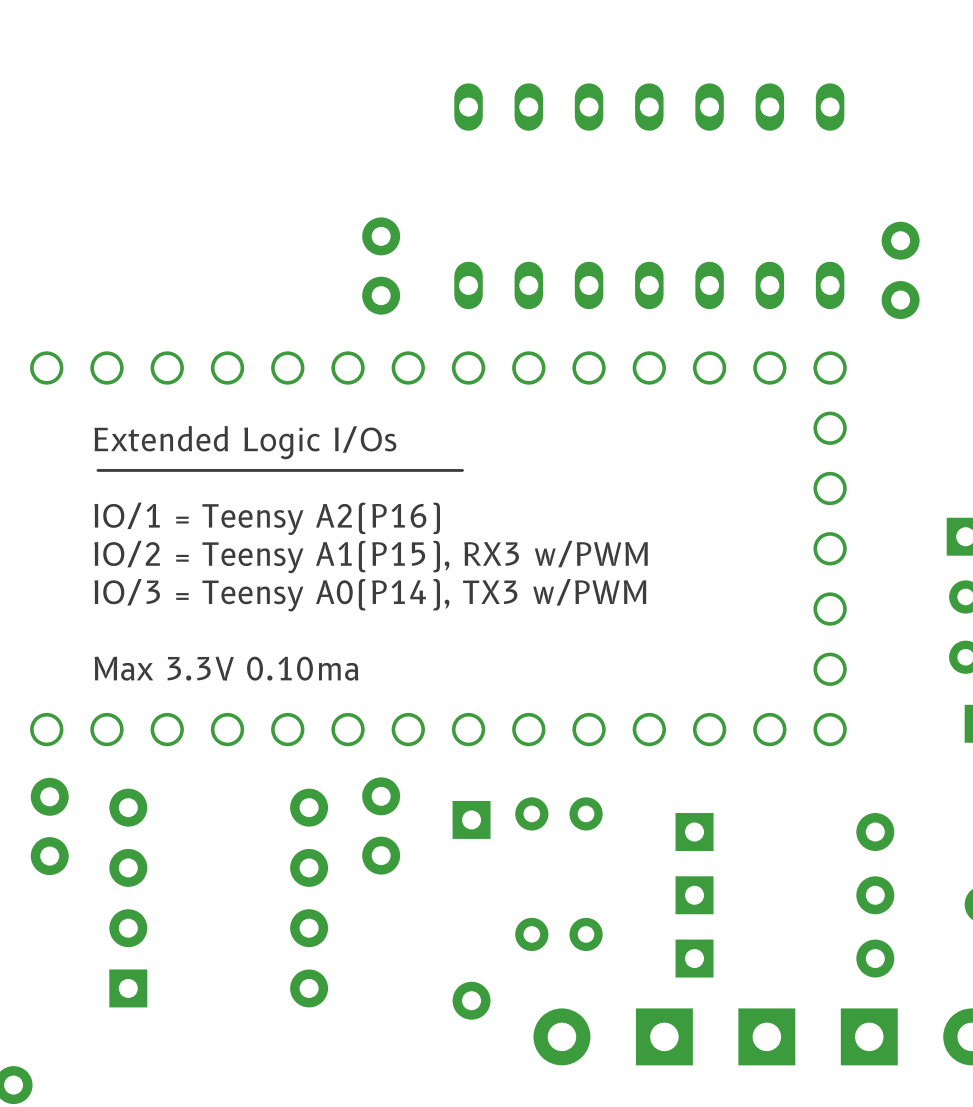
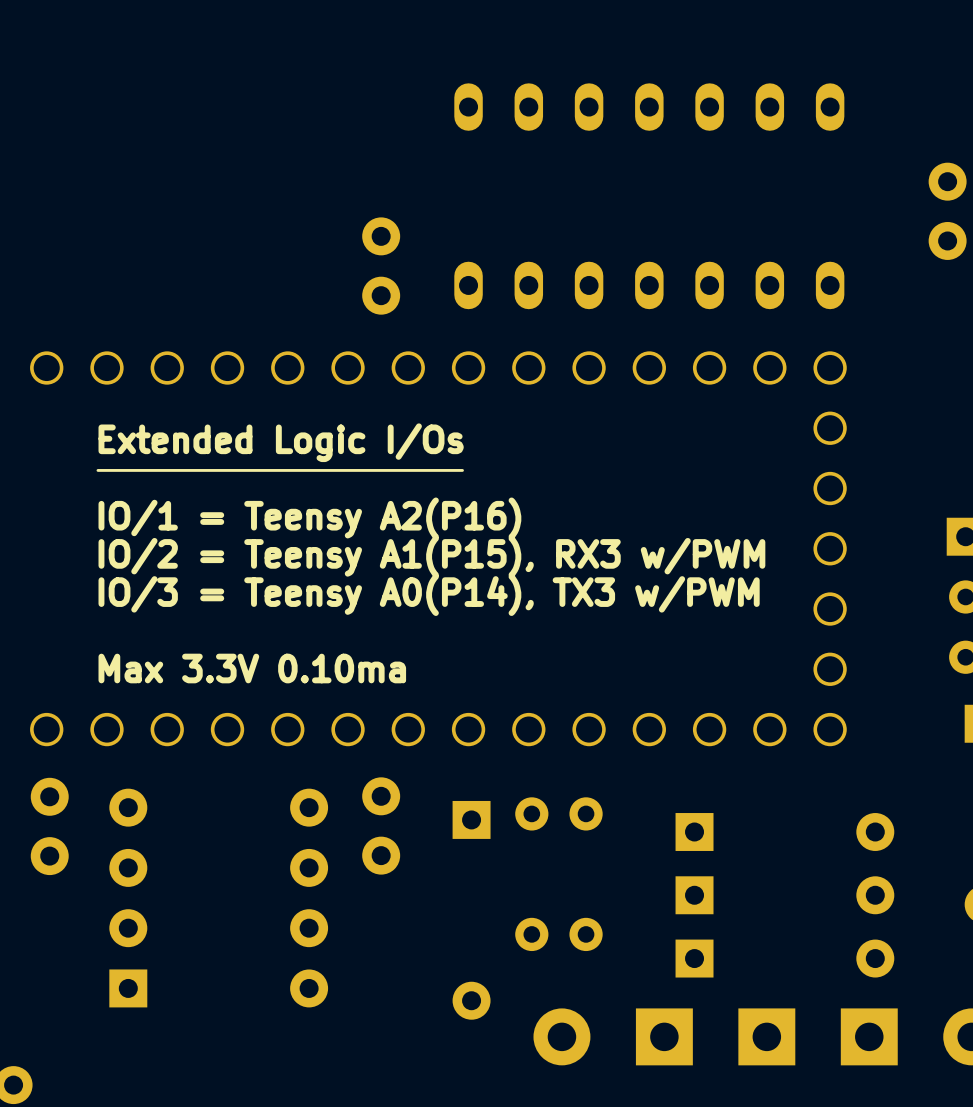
part position: (900, 270) -> (947, 211)

